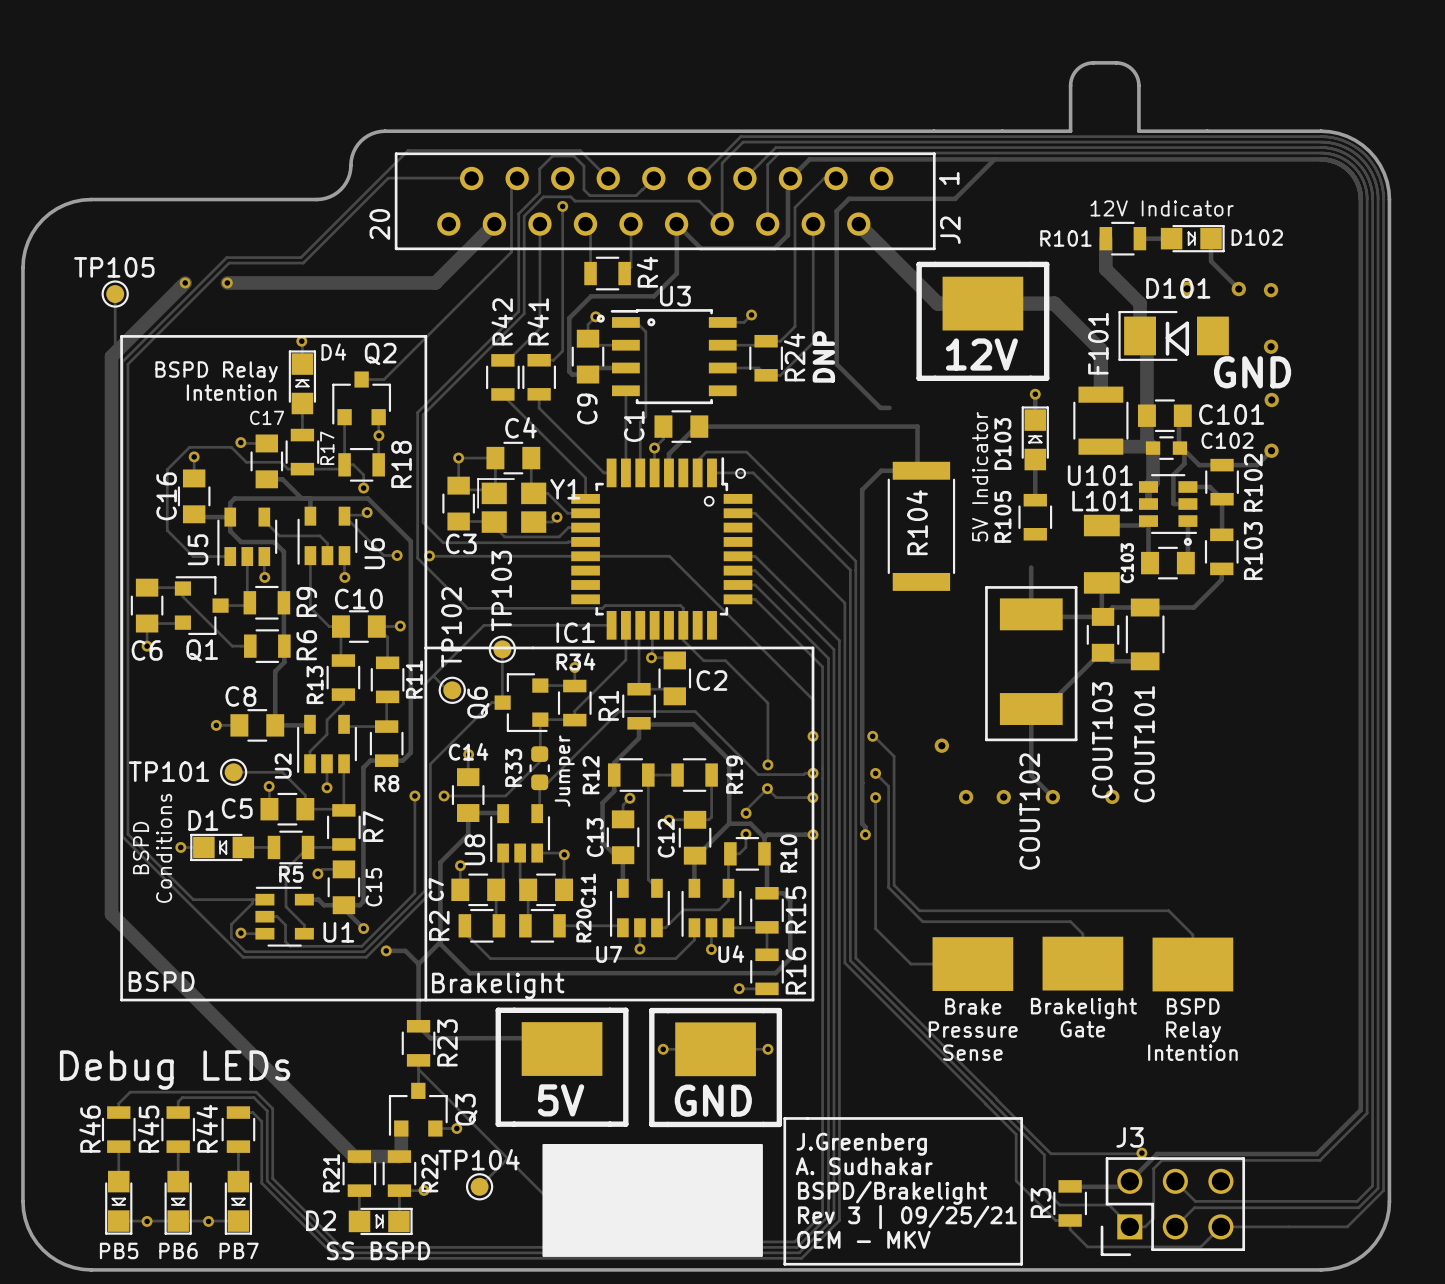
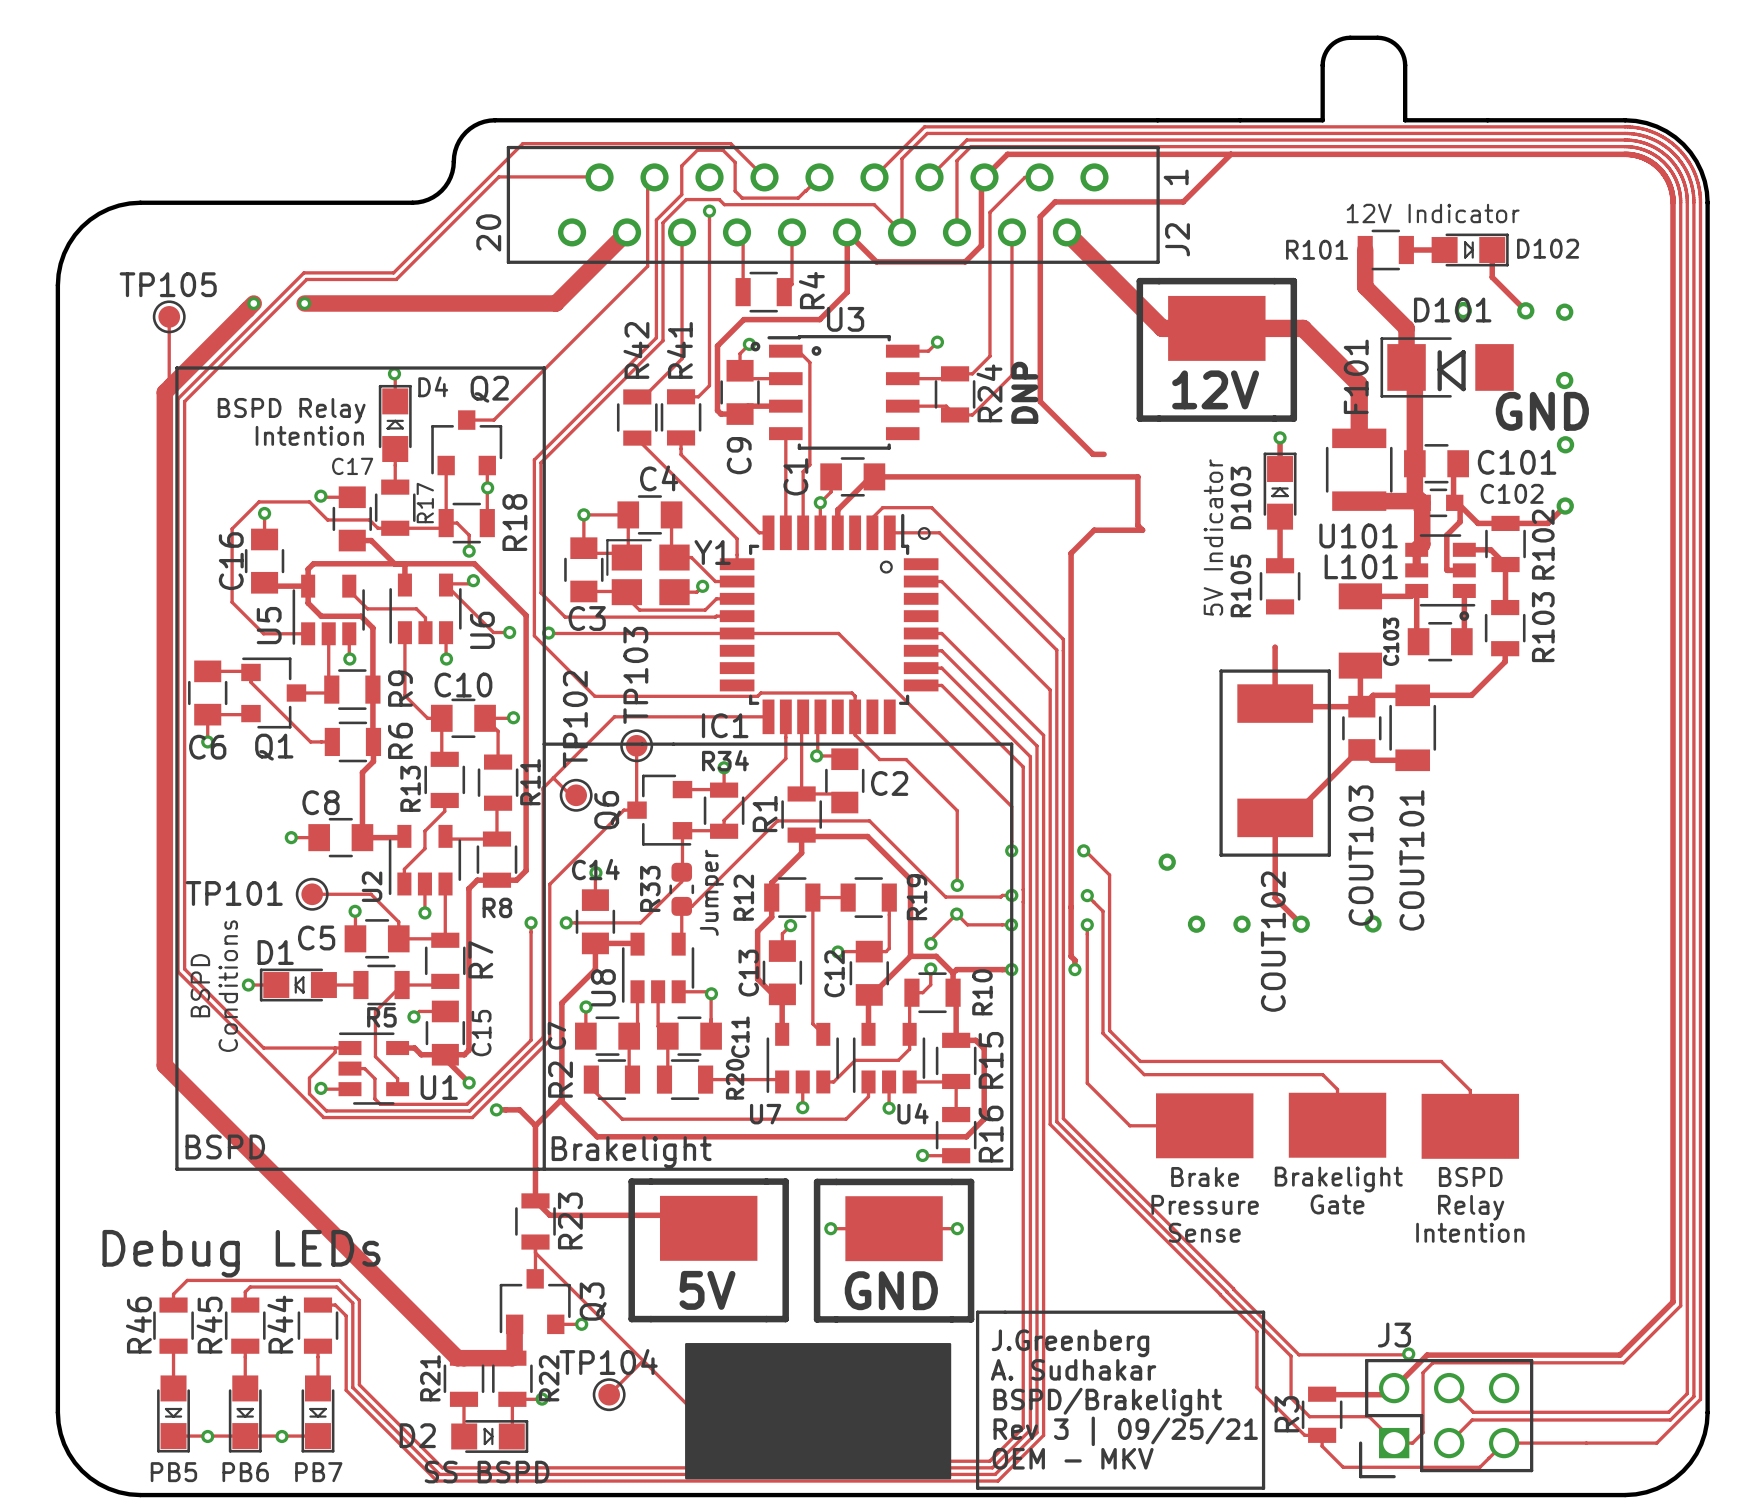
R104: (921, 526) -> none

